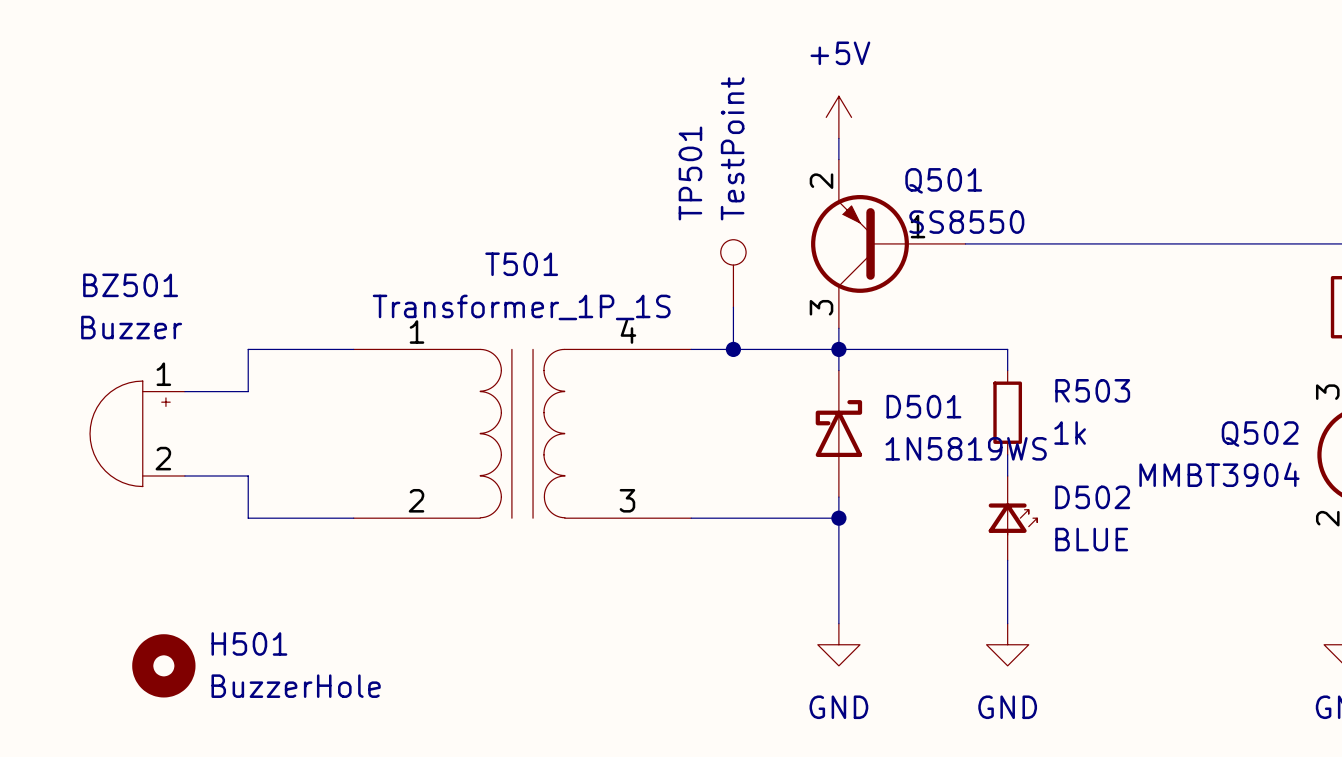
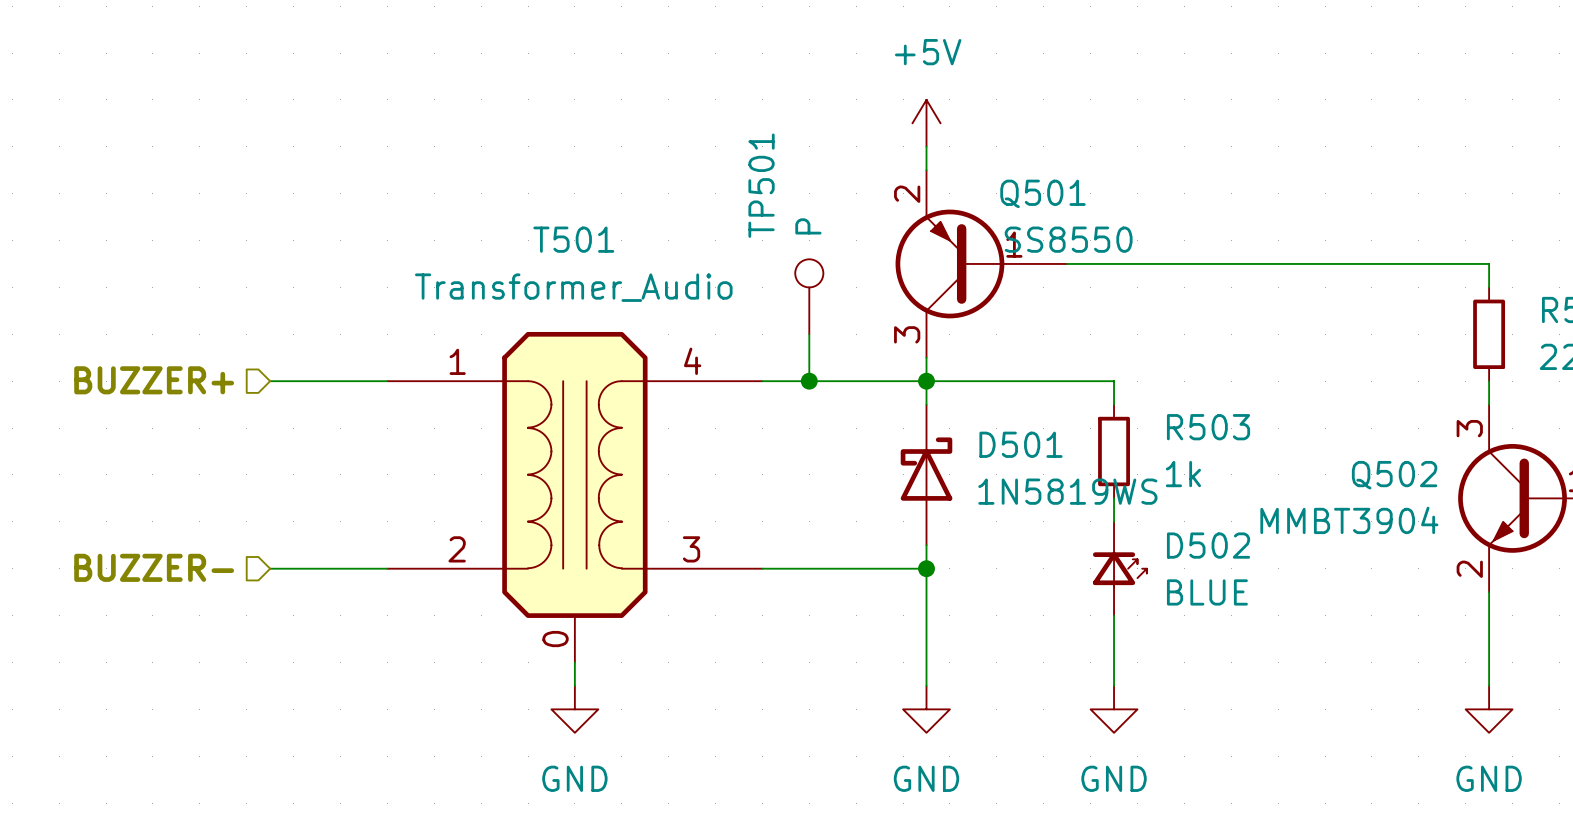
TP501 value: TestPoint (732, 148) -> P (808, 226)
T501 name position: T501 (521, 264) -> T501 (573, 239)
T501 value: Transformer_1P_1S (521, 307) -> Transformer_Audio (573, 287)
hierarchical label: none -> BUZZER+ (154, 380)
wire: (248, 349) (248, 391) (184, 391) -> none
T501 symbol: [353, 349, 692, 519] -> [387, 331, 763, 663]
BZ501: Buzzer (137, 433) -> none
wire: (184, 475) (248, 475) (248, 518) -> none
hierarchical label: none -> BUZZER- (154, 567)
wire: none -> (574, 662) (574, 685)
power symbol: none -> GND (574, 709)
H501: BuzzerHole (163, 665) -> none

